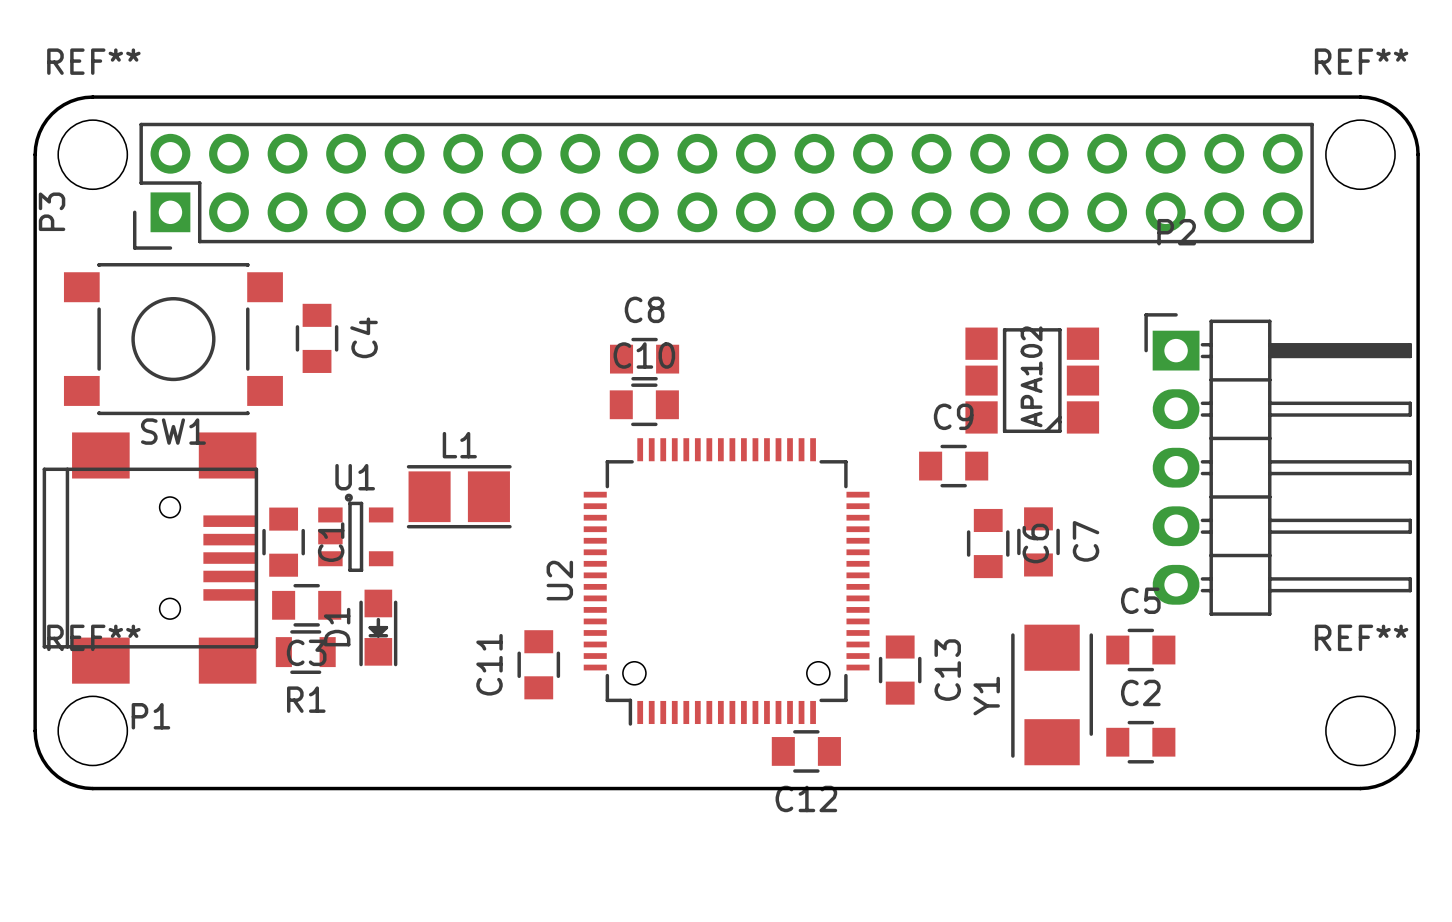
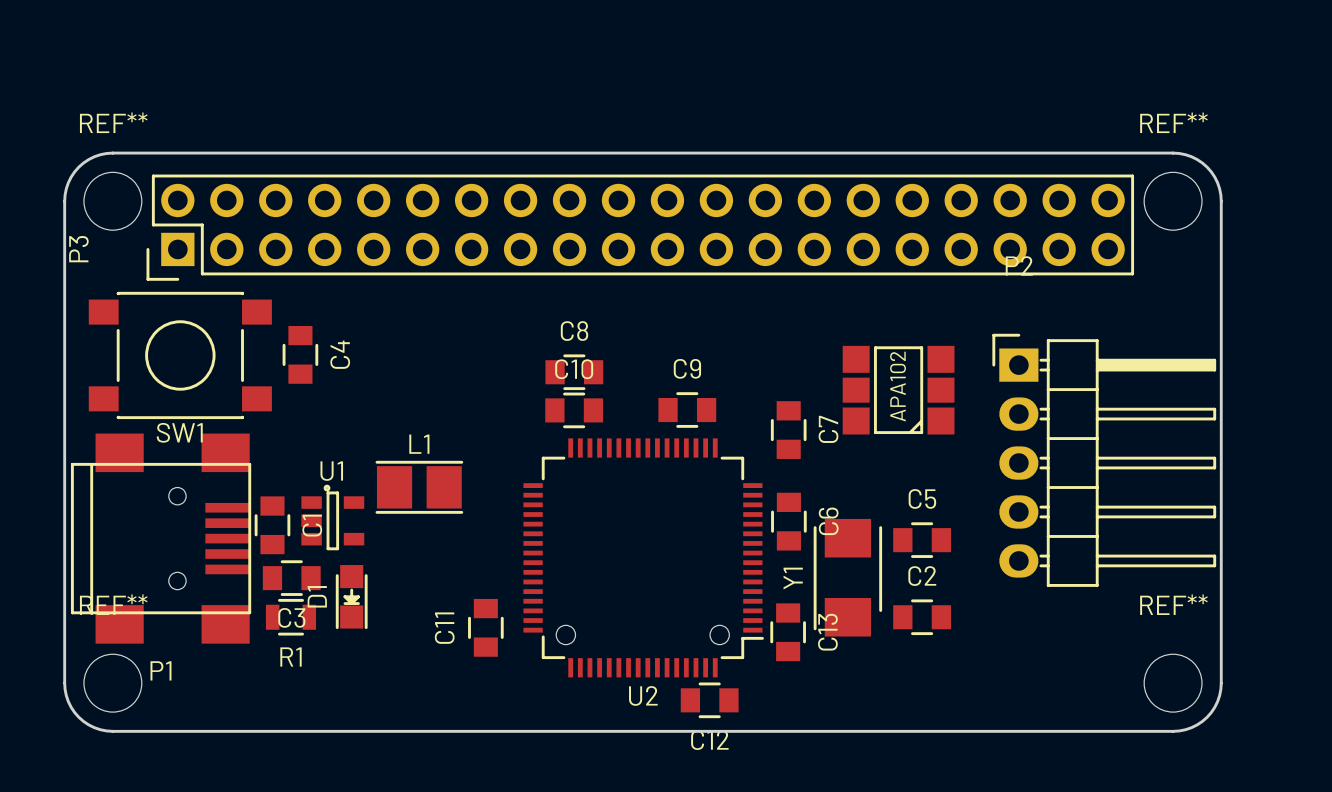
C9 position: (953, 466) -> (687, 410)
C7 position: (1038, 541) -> (788, 430)
C6 position: (988, 543) -> (788, 521)
U2 rotation: 0° (726, 581) -> 90° counterclockwise (643, 557)
C5 position: (1140, 650) -> (922, 540)
Y1 position: (1052, 694) -> (847, 577)
C2 position: (1140, 742) -> (922, 617)

